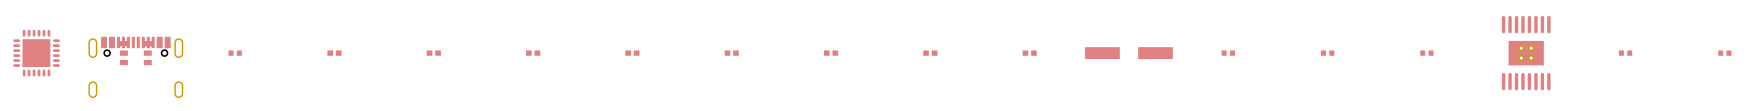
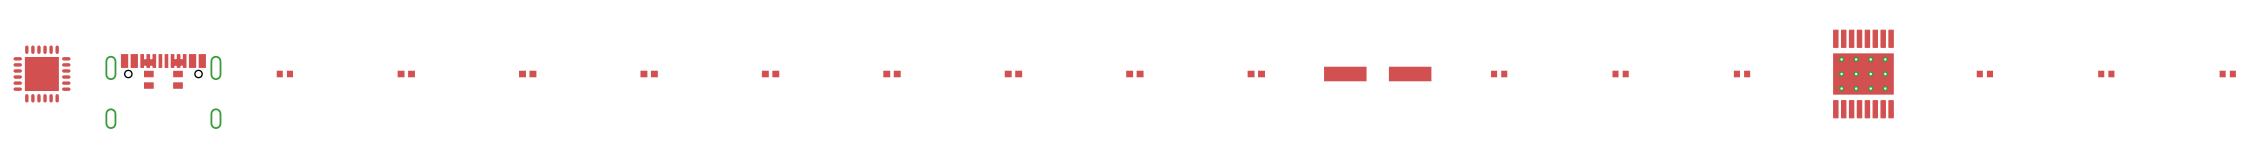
part footprint: [1501, 15, 1551, 91] -> [1833, 29, 1894, 119]

